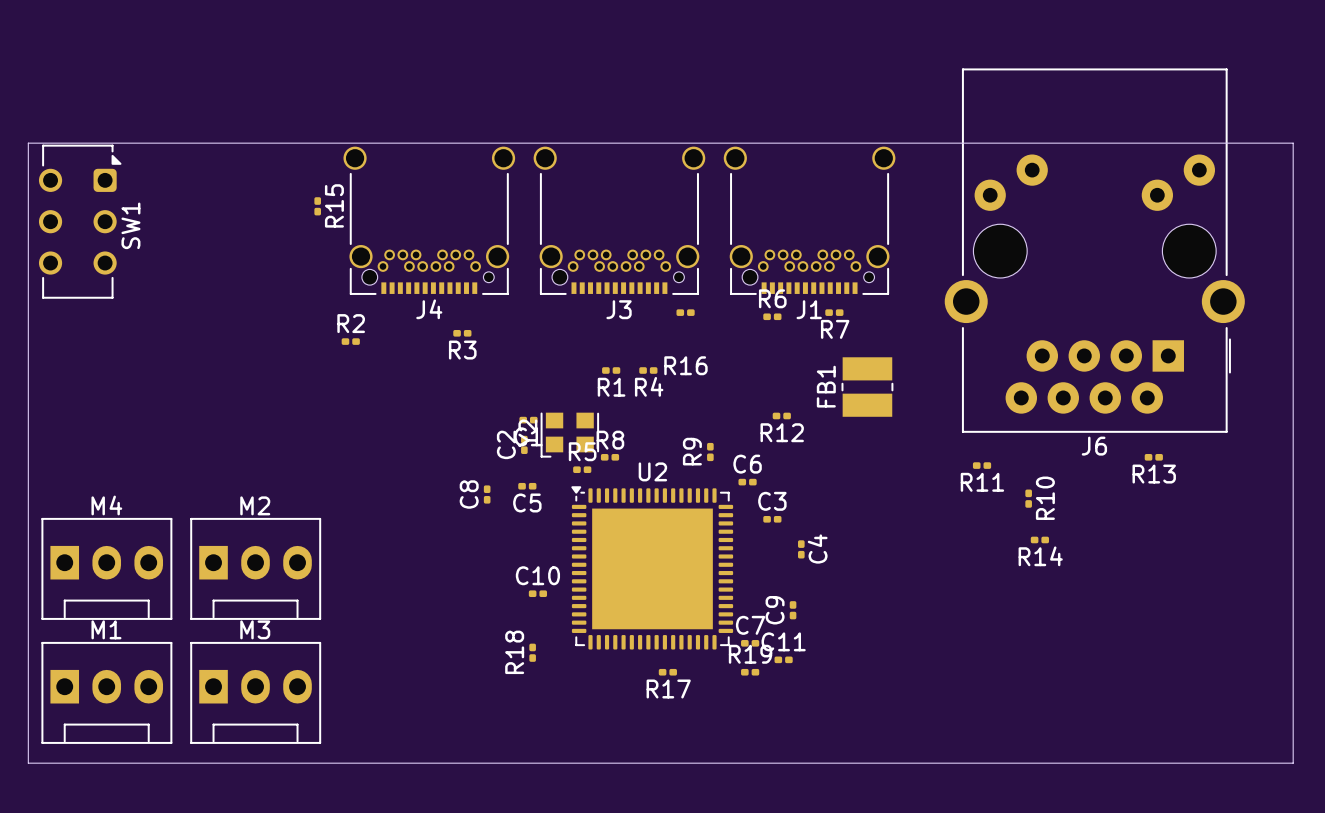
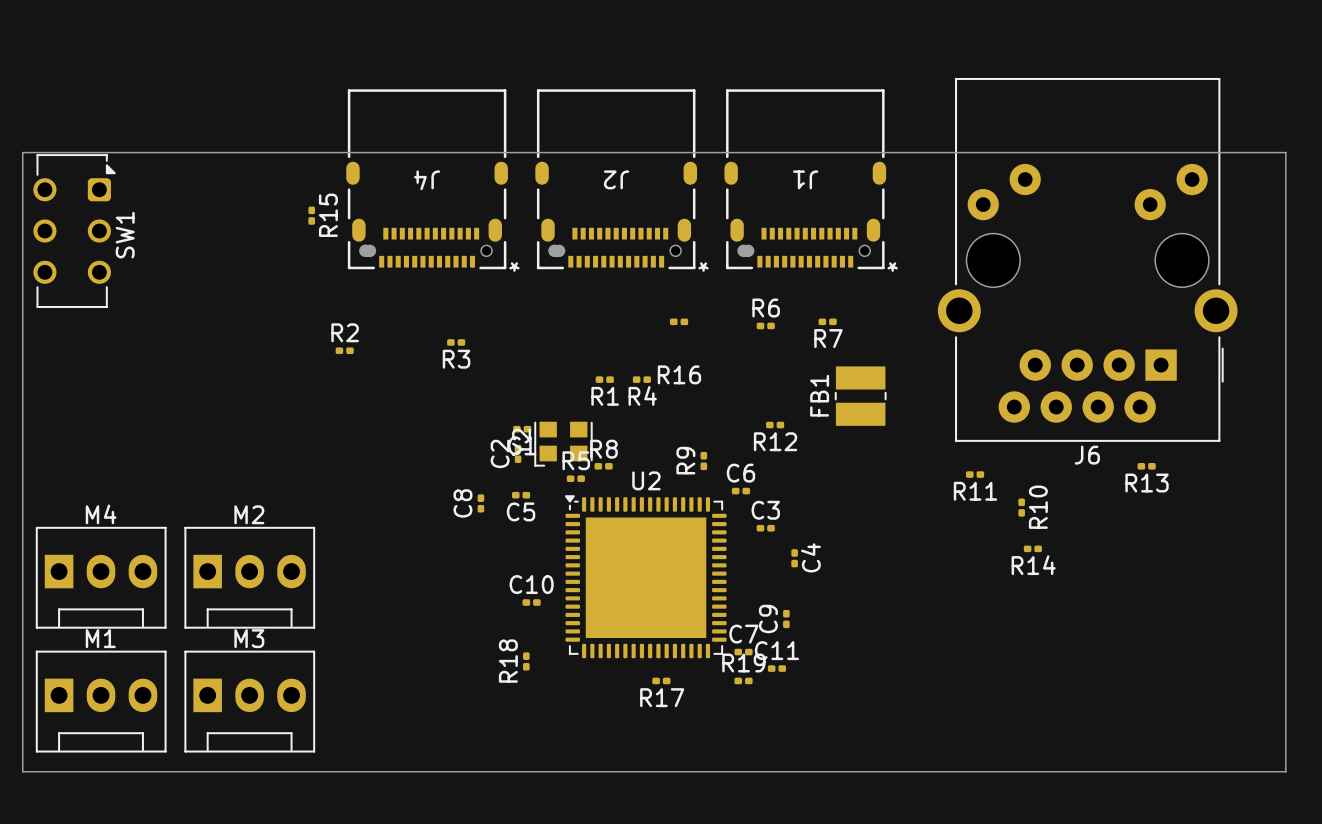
J4 footprint: [343, 146, 516, 295] -> [346, 89, 508, 270]
J1 footprint: [723, 146, 896, 295] -> [724, 89, 887, 270]
J2: none -> (616, 179)
J3: (619, 220) -> none
J4 name position: J4 (429, 309) -> J4 (427, 180)
J1 name position: J1 (809, 309) -> J1 (805, 179)

